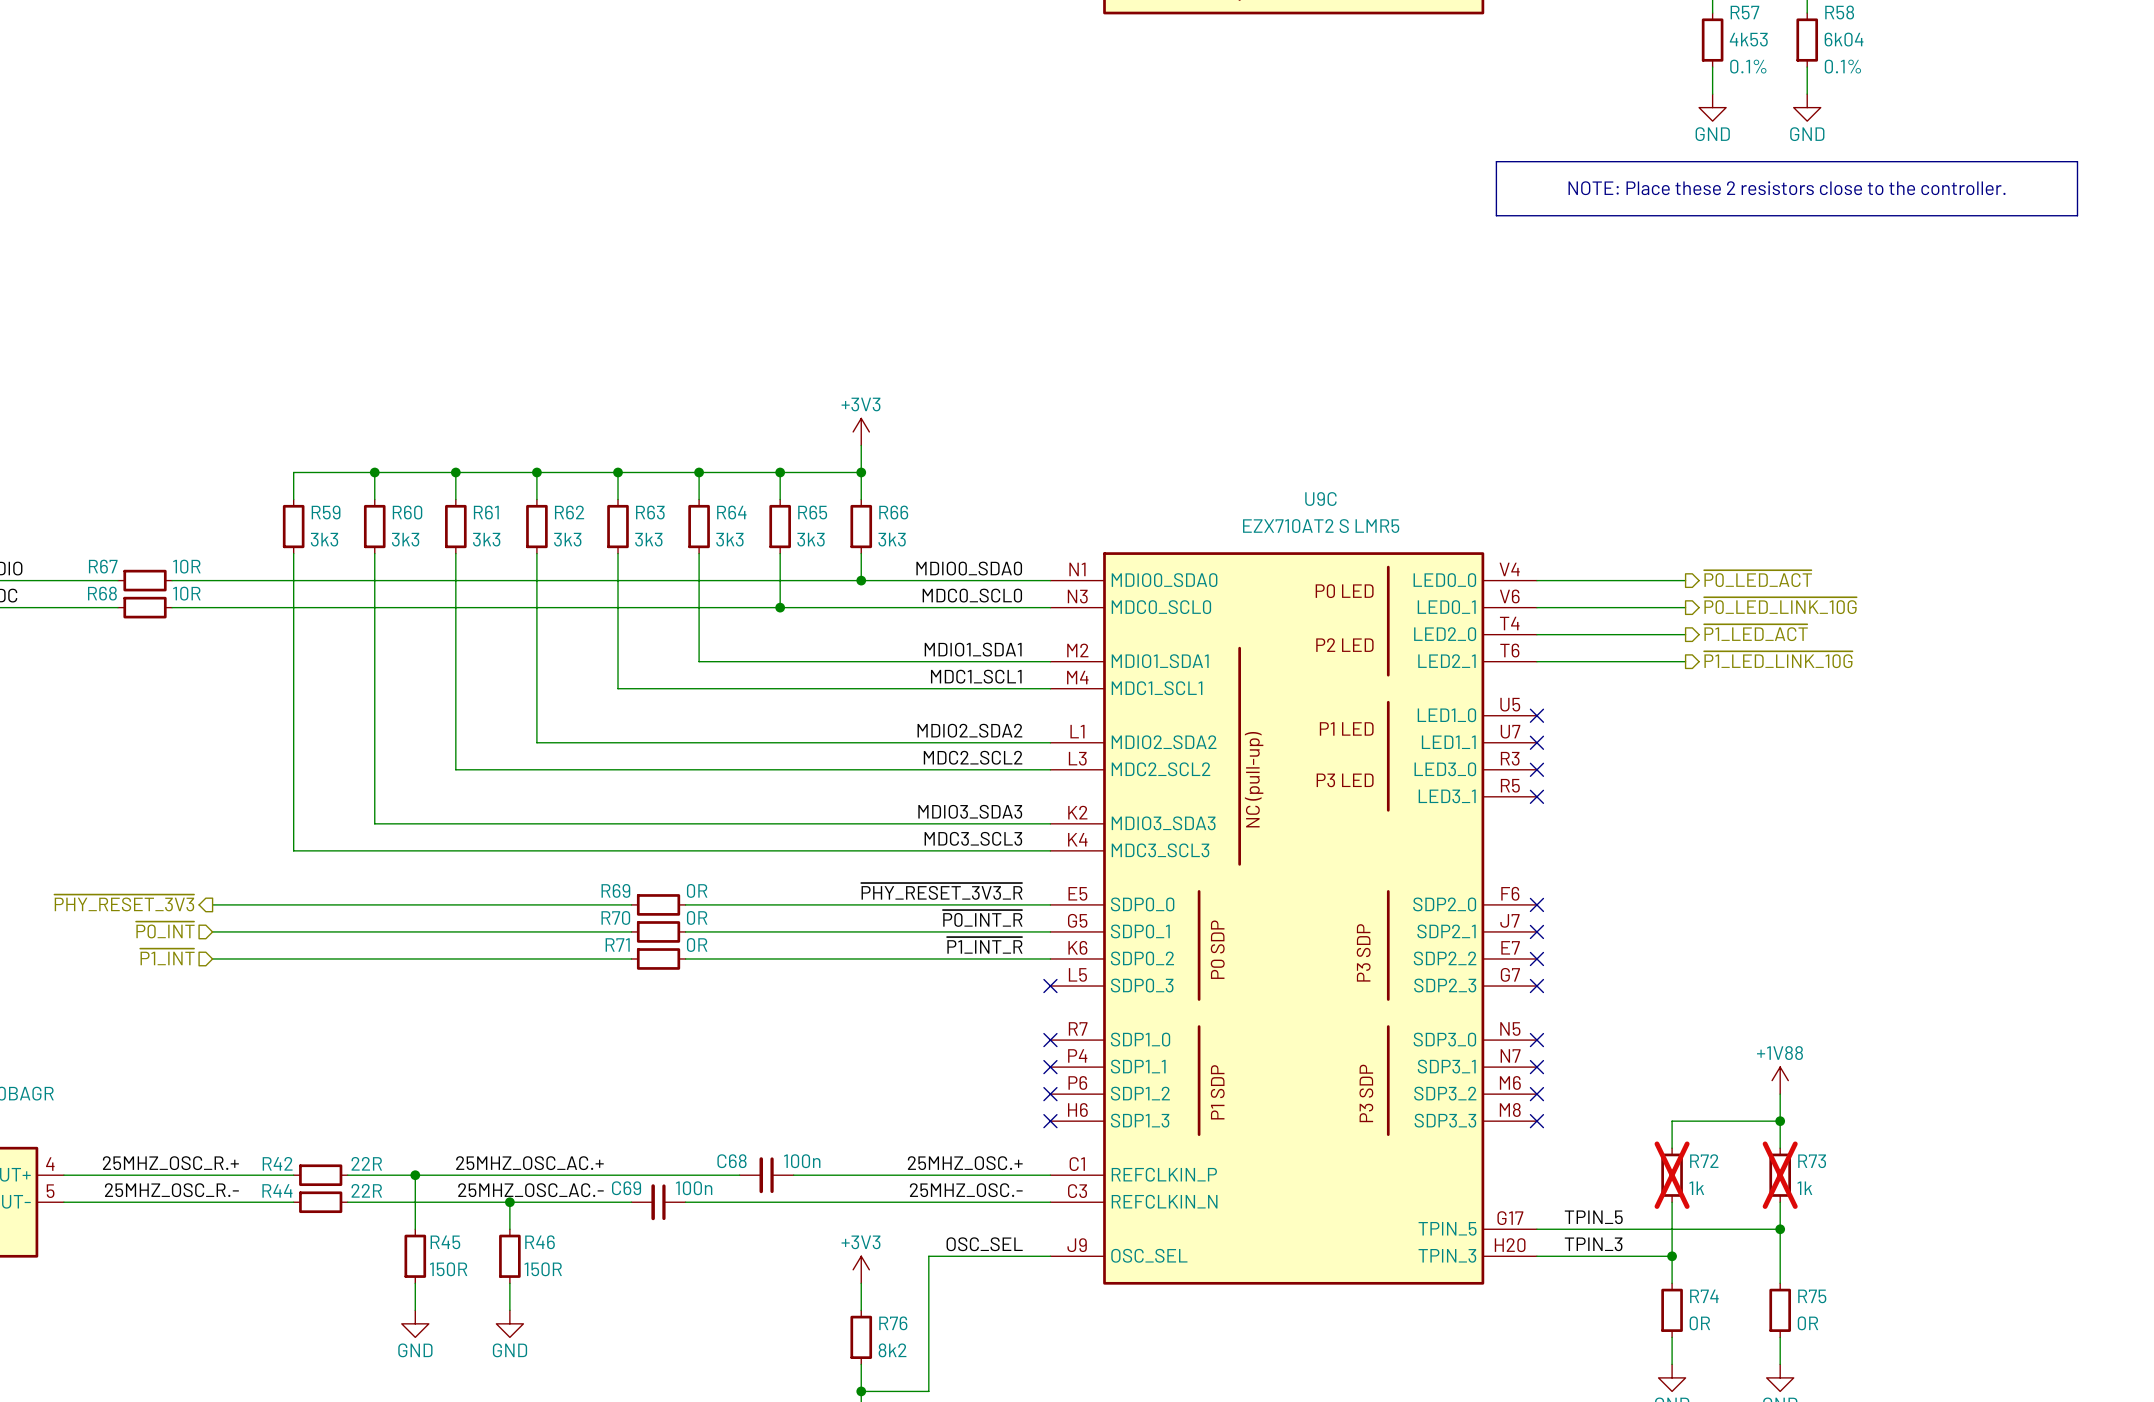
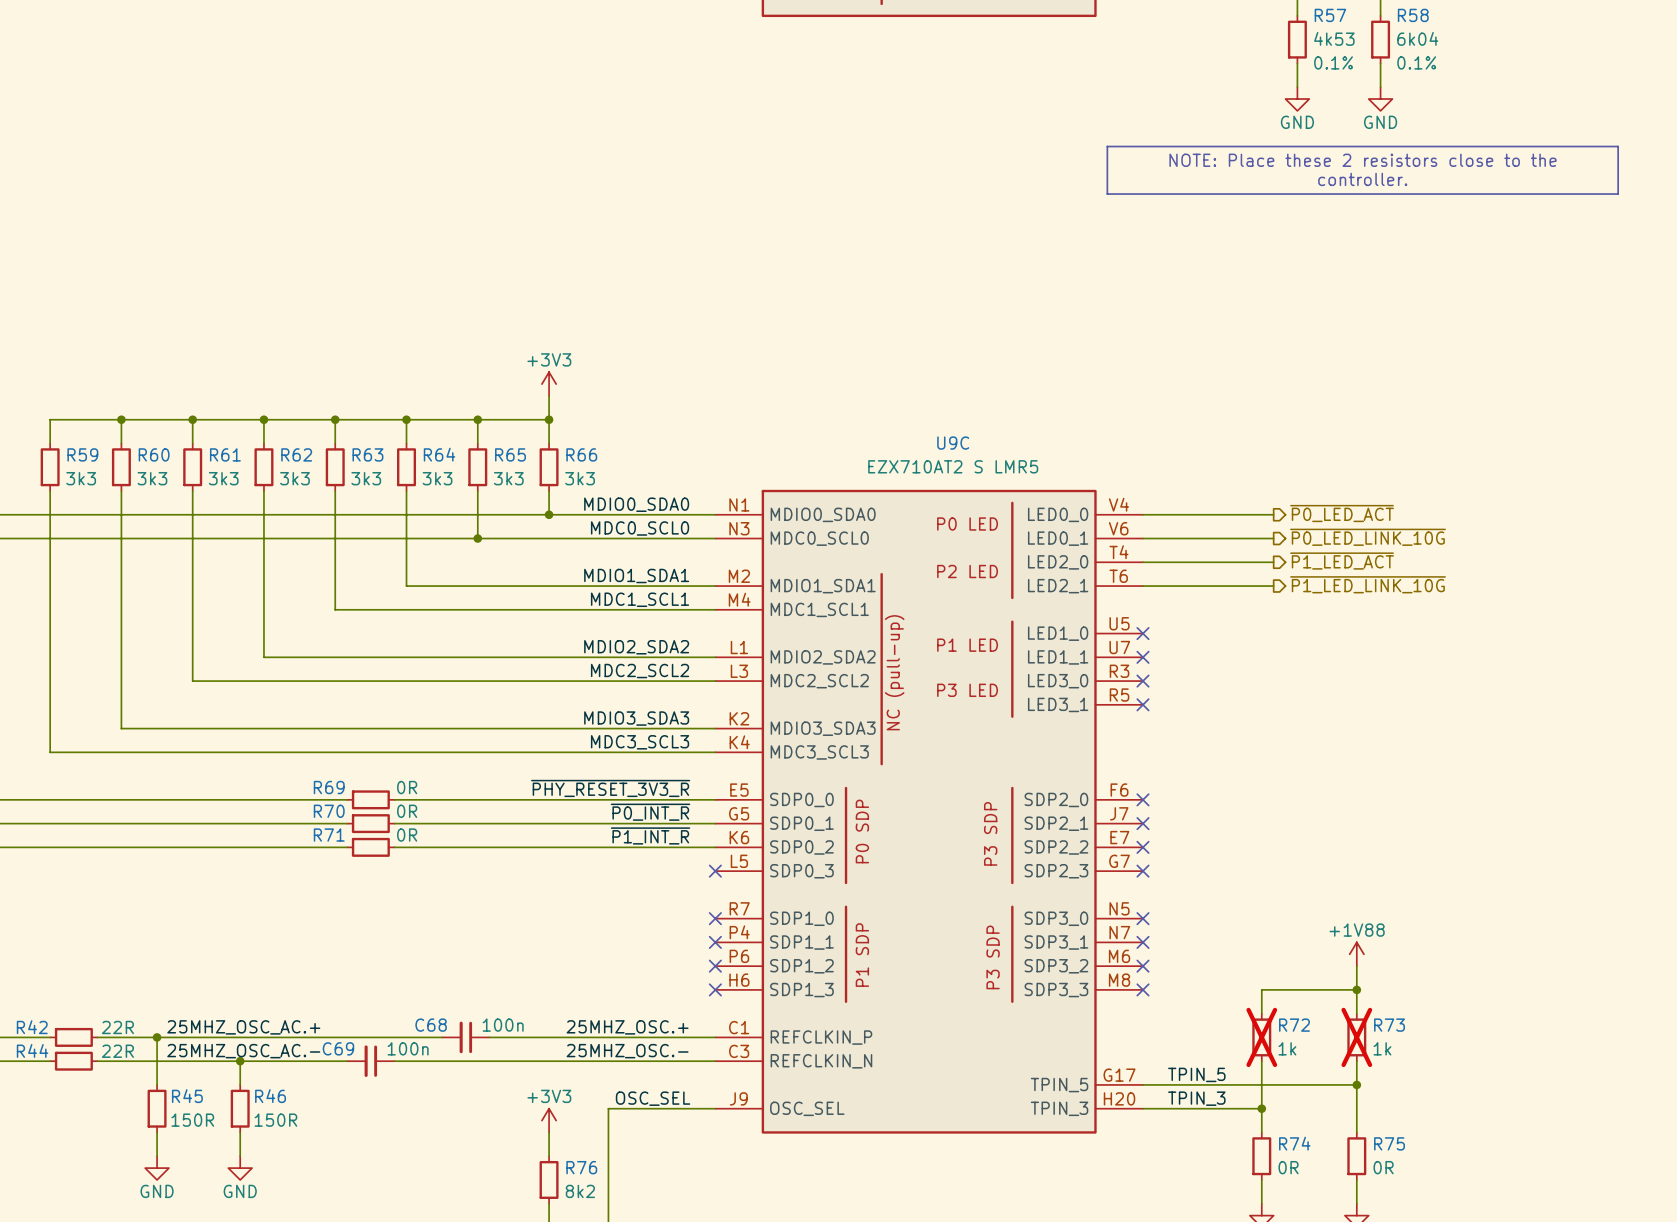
text: NOTE: Place these 2 resistors close to the controller. (1787, 188) -> NOTE: Place these 2 resistors close to the (1363, 160)
text: none -> controller. (1362, 179)

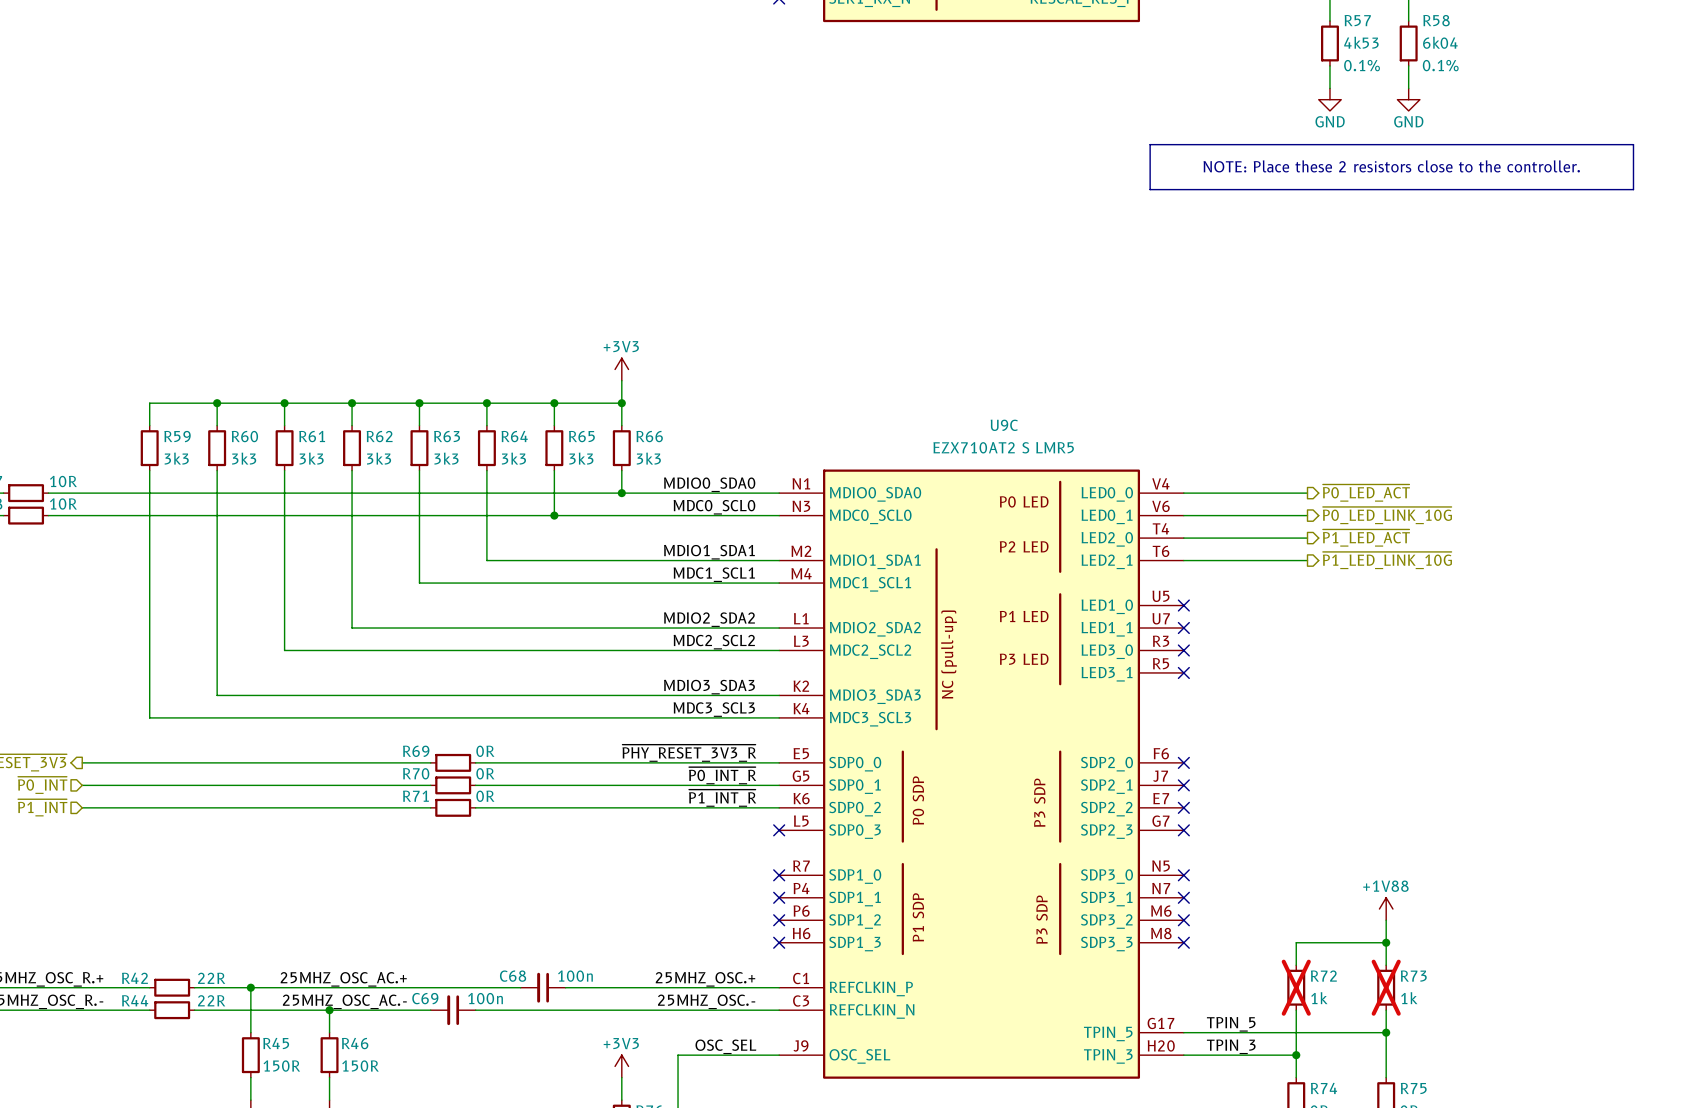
text: NOTE: Place these 2 resistors close to the (1363, 160) -> NOTE: Place these 2 resistors close to the controller. (1391, 166)
text: controller. (1362, 179) -> none

